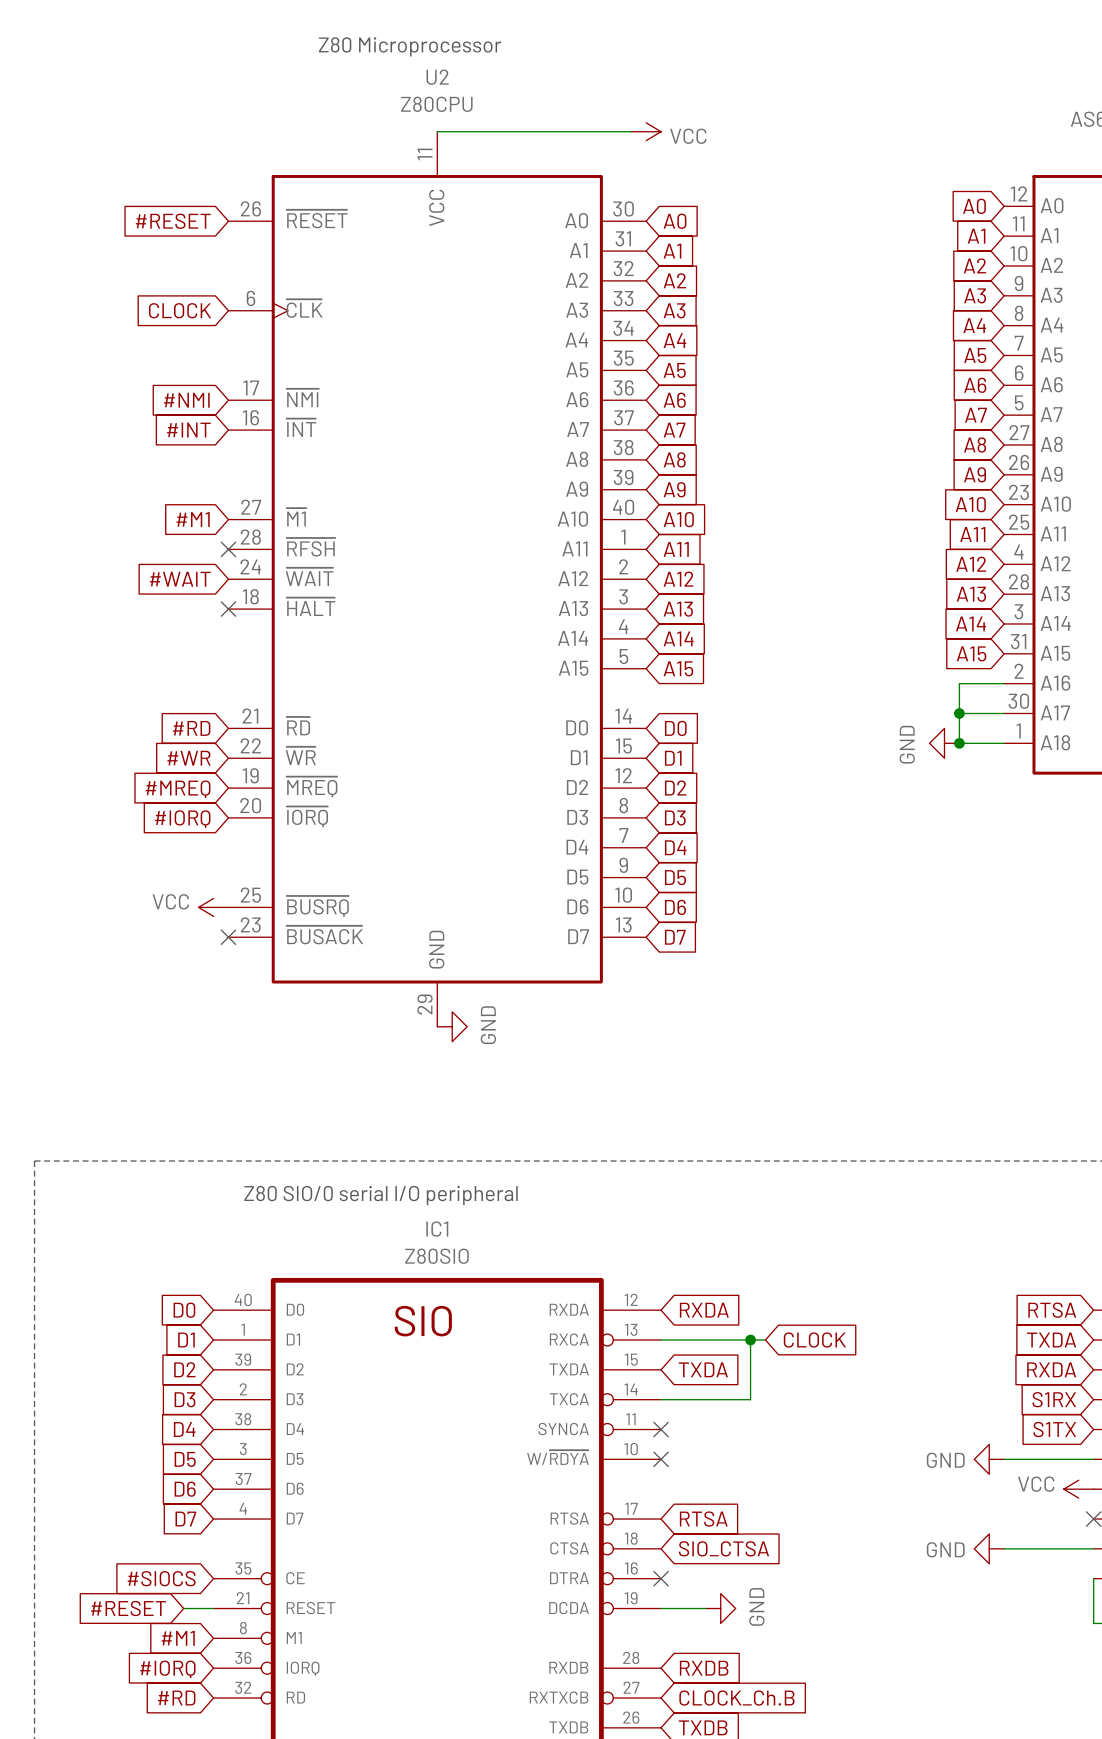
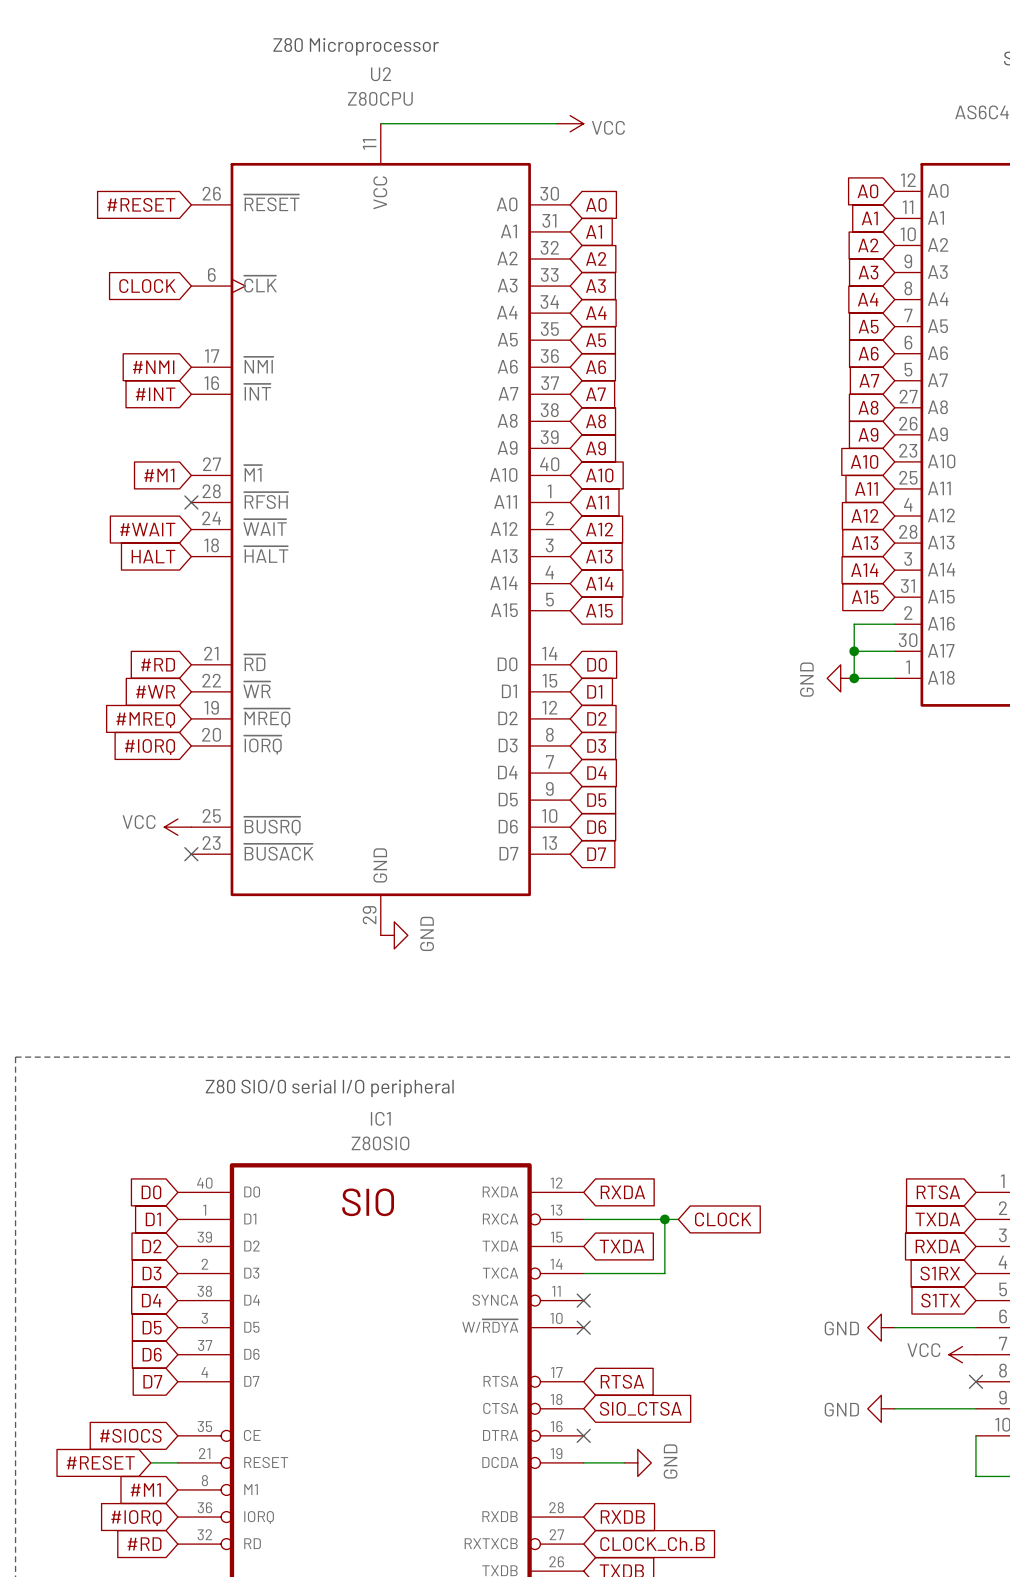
global label: none -> HALT (153, 556)
no-connect mark: (228, 609) -> none

